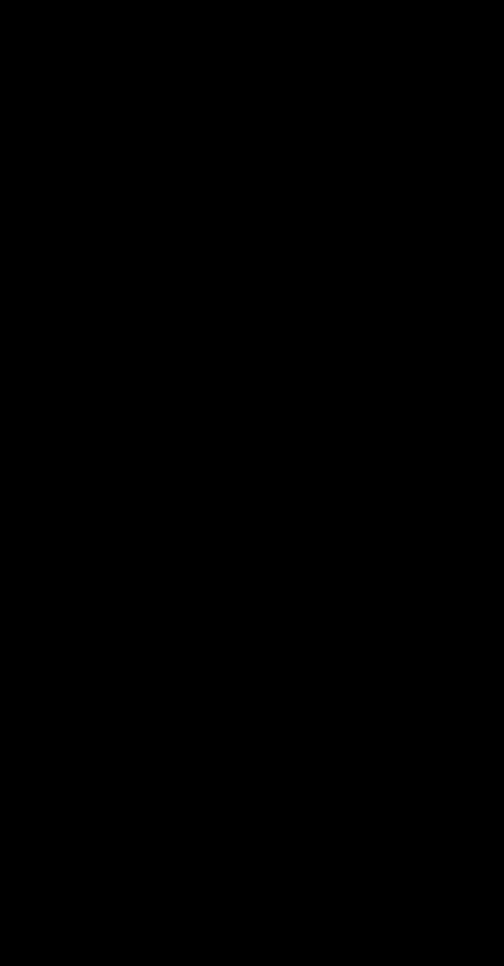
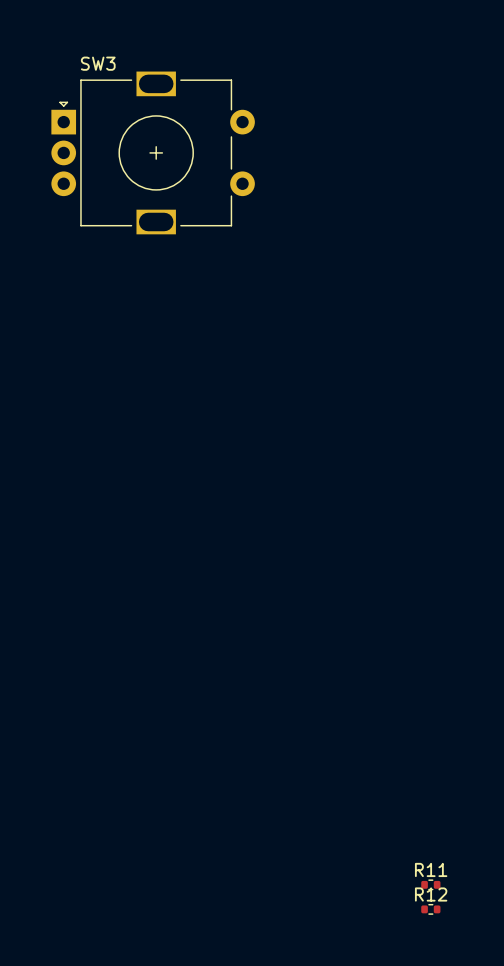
SW3: none -> (153, 152)
R11: none -> (430, 884)
R12: none -> (430, 909)

